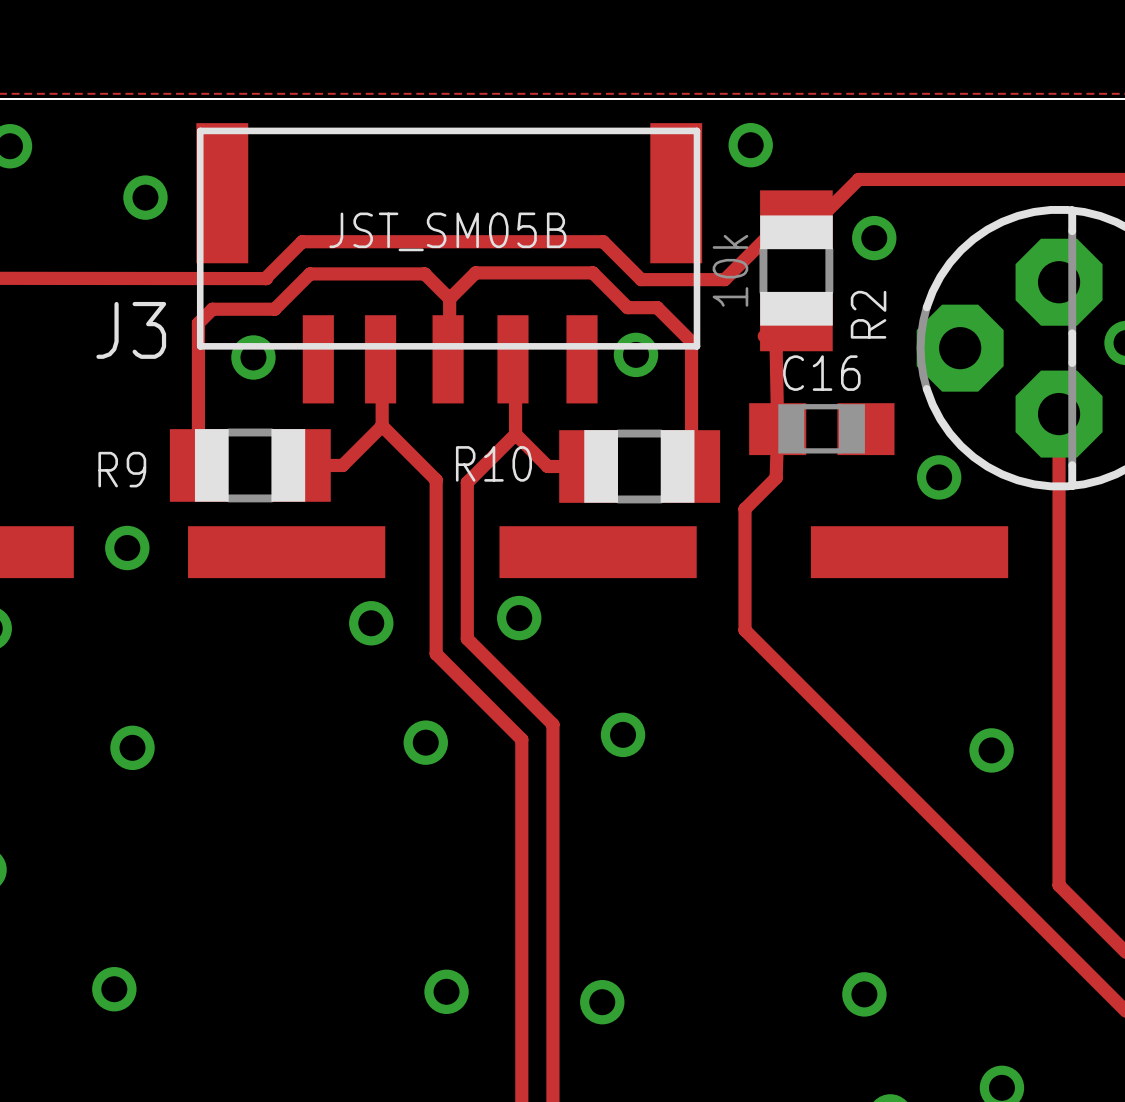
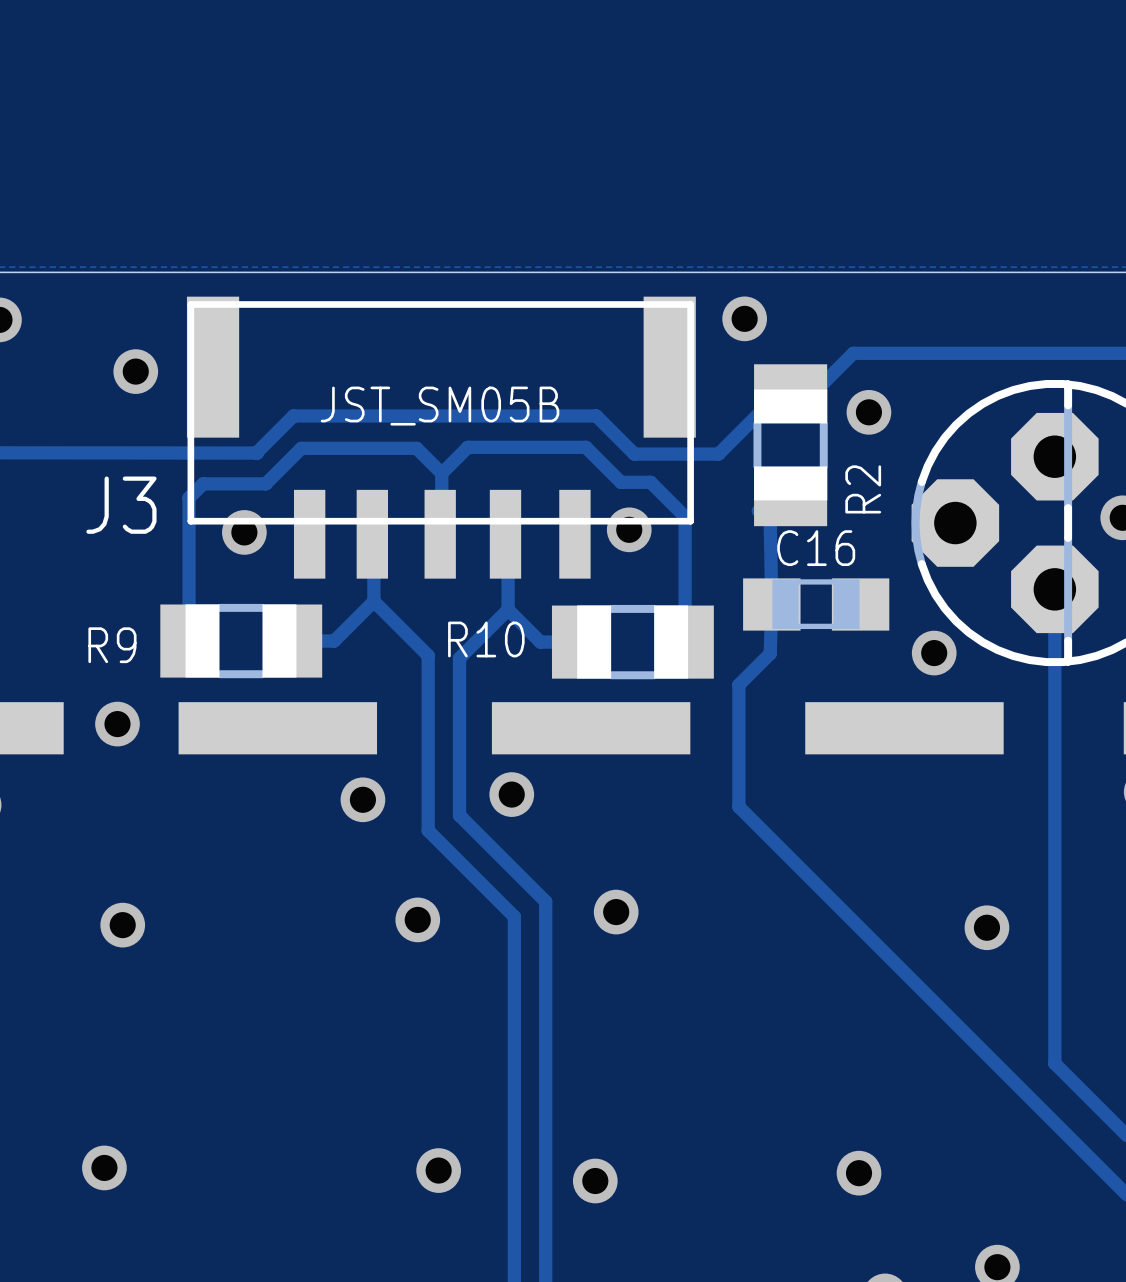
R2 value: 10k (730, 270) -> none

